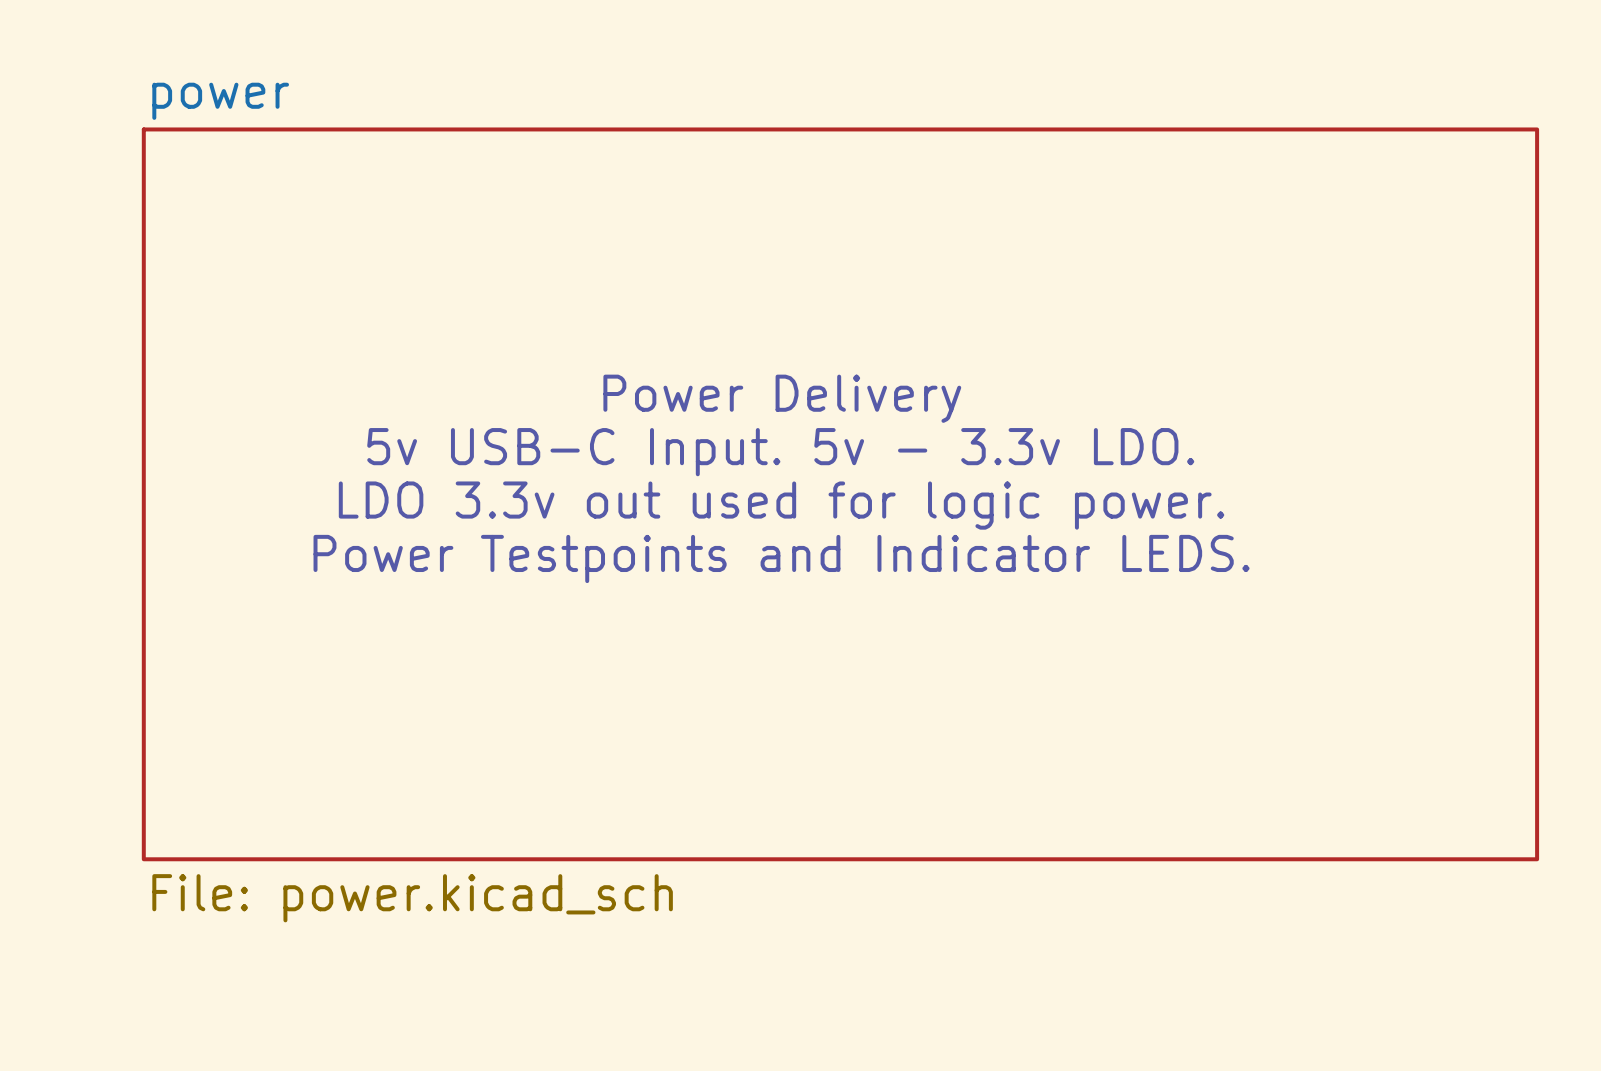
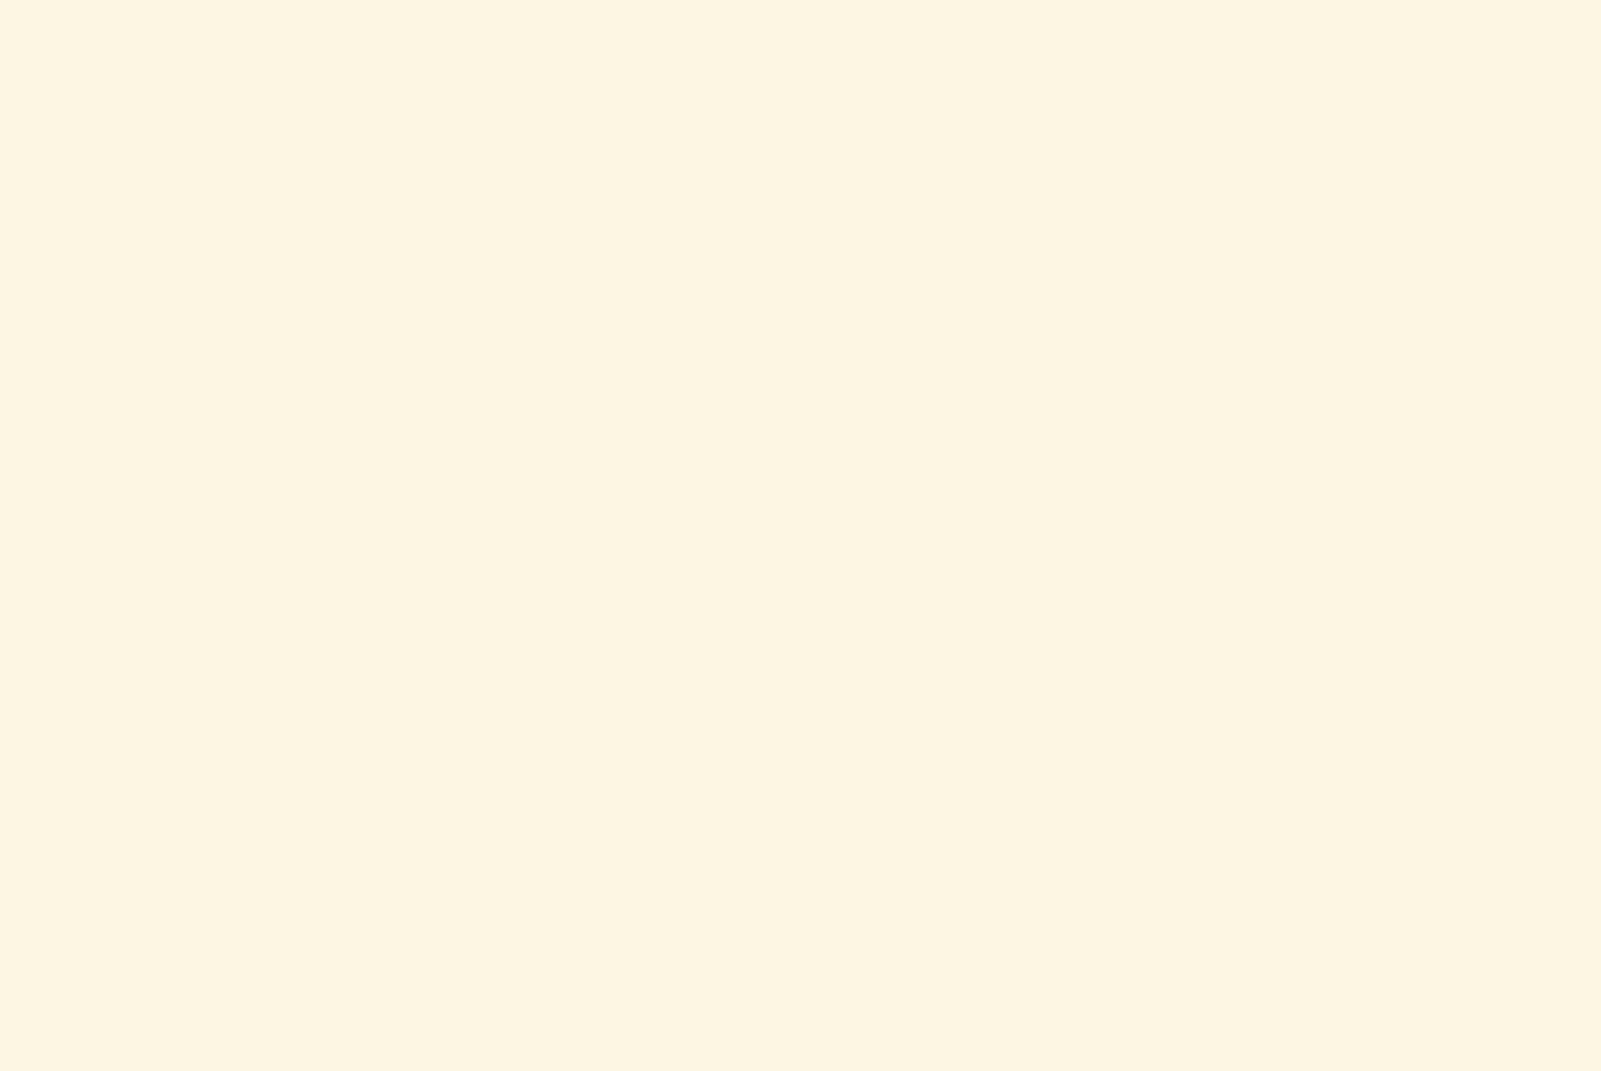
text: Power Delivery (782, 398) -> none
text: 5v USB-C Input. 5v - 3.3v LDO. (780, 452) -> none
sheet power: File: power.kicad_sch (840, 494) -> none
text: LDO 3.3v out used for logic power. (781, 505) -> none
text: Power Testpoints and Indicator LEDS. (781, 558) -> none

